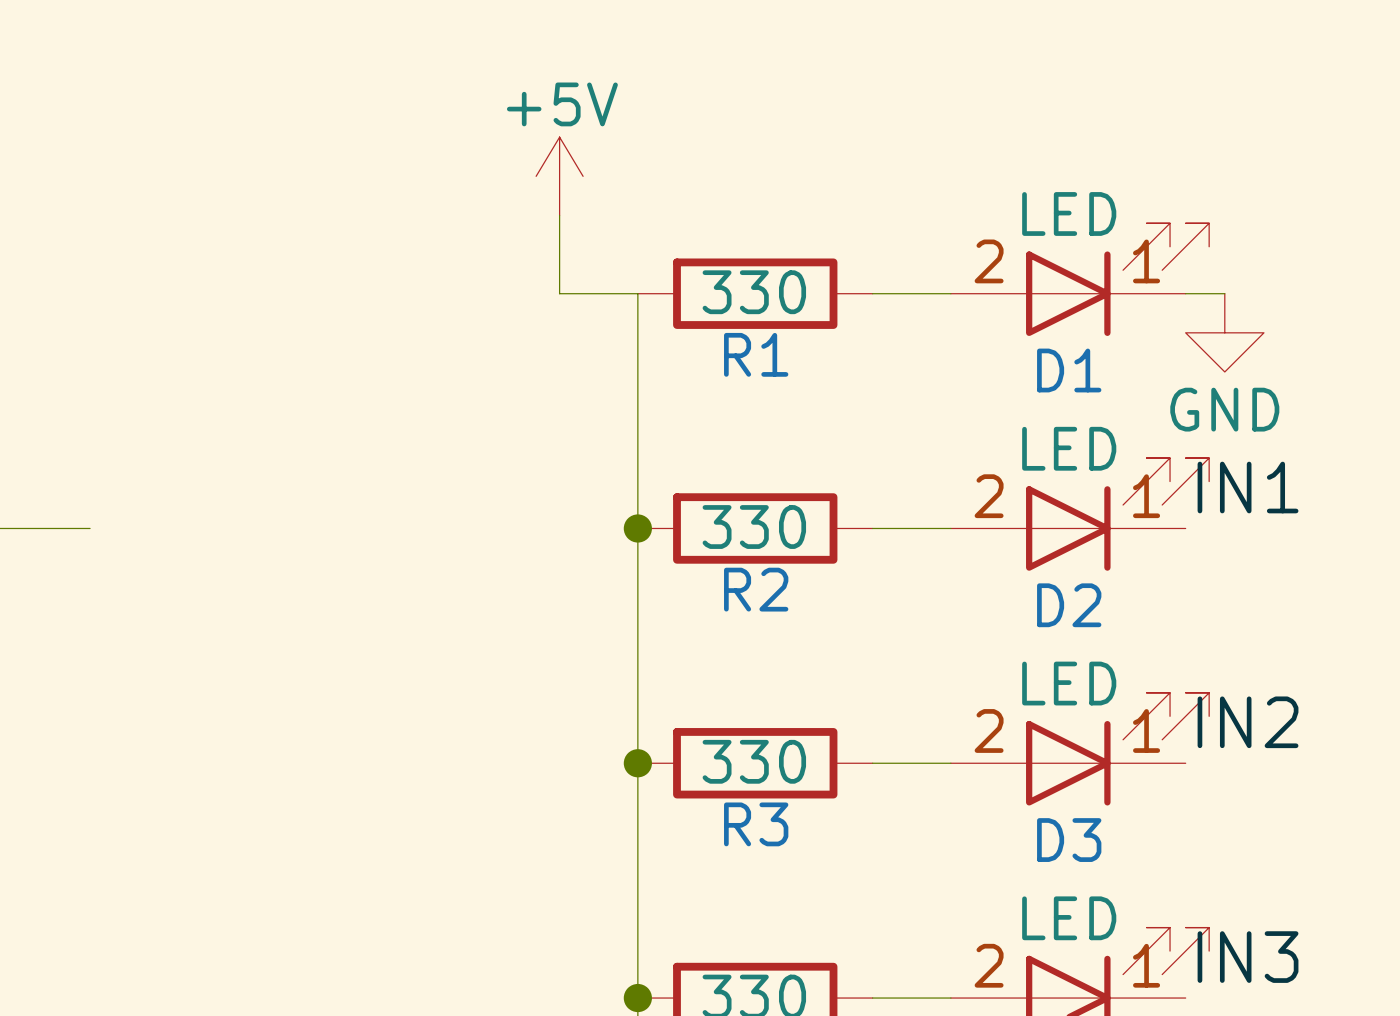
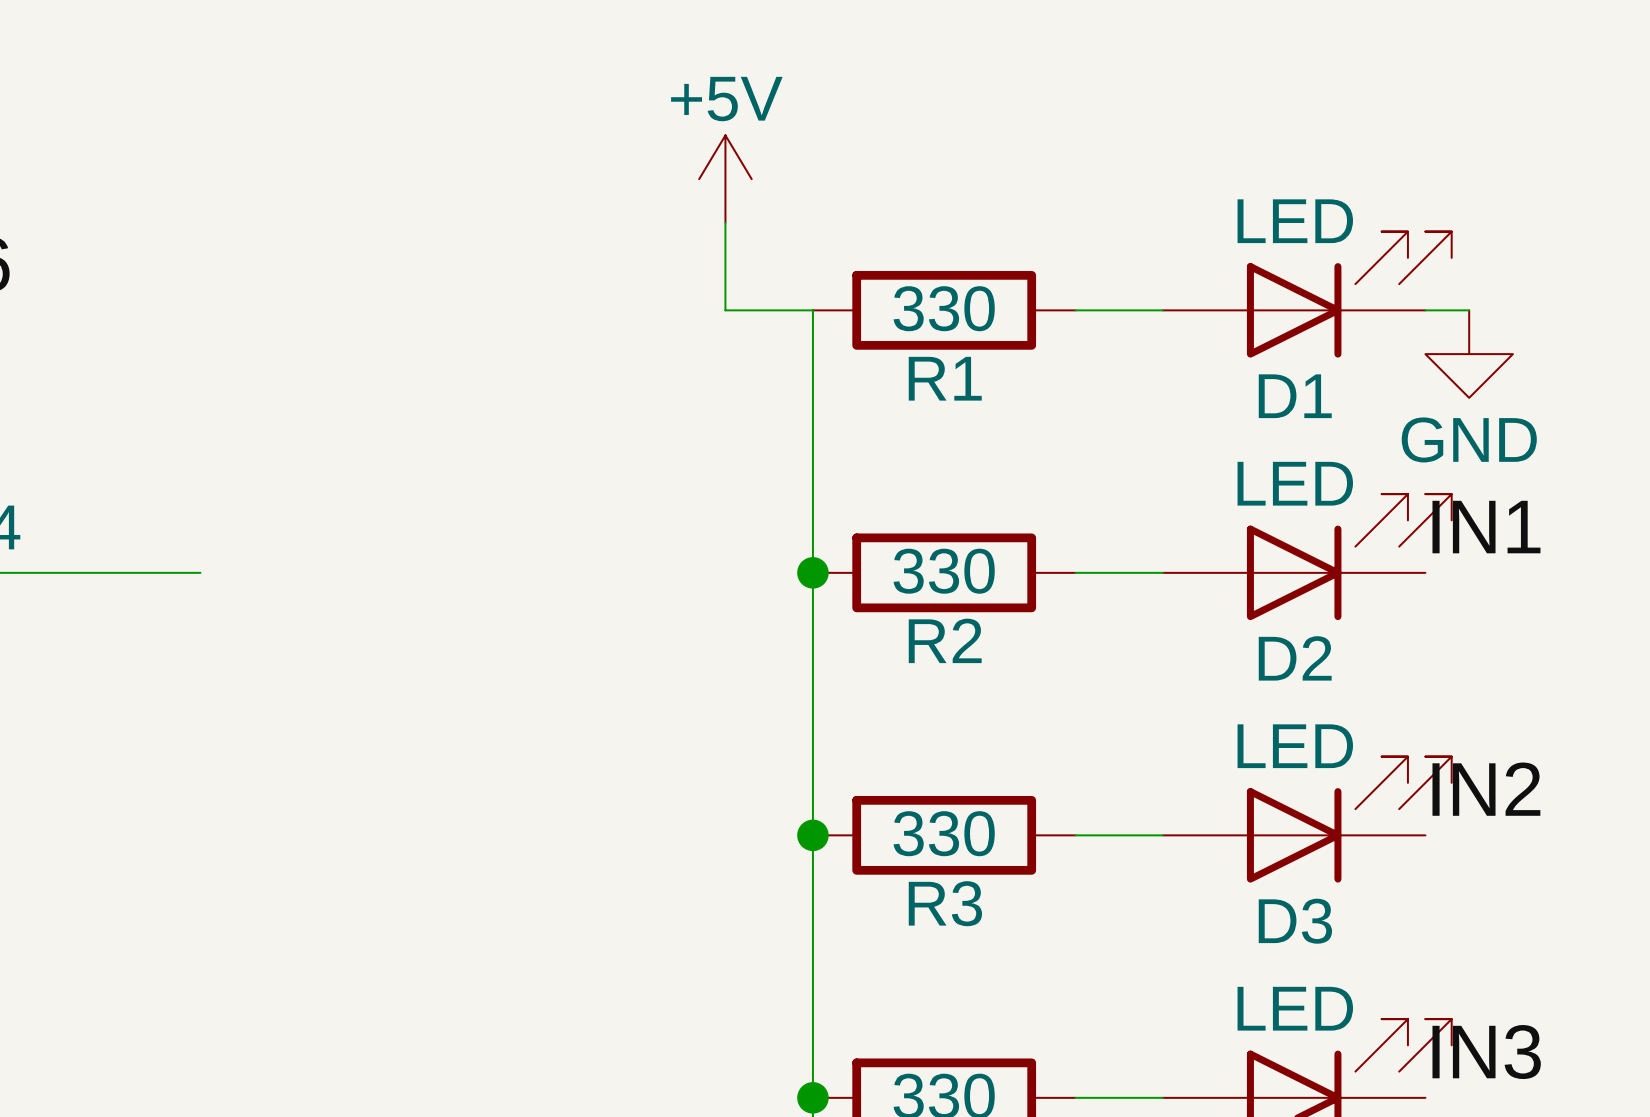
D1 pin number: 2 (989, 261) -> none
D1 pin number: 1 (1146, 261) -> none
D2 pin number: 2 (989, 496) -> none
D2 pin number: 1 (1146, 496) -> none
D3 pin number: 2 (989, 730) -> none
D3 pin number: 1 (1146, 730) -> none
part pin number: 2 (989, 965) -> none
part pin number: 1 (1146, 965) -> none

